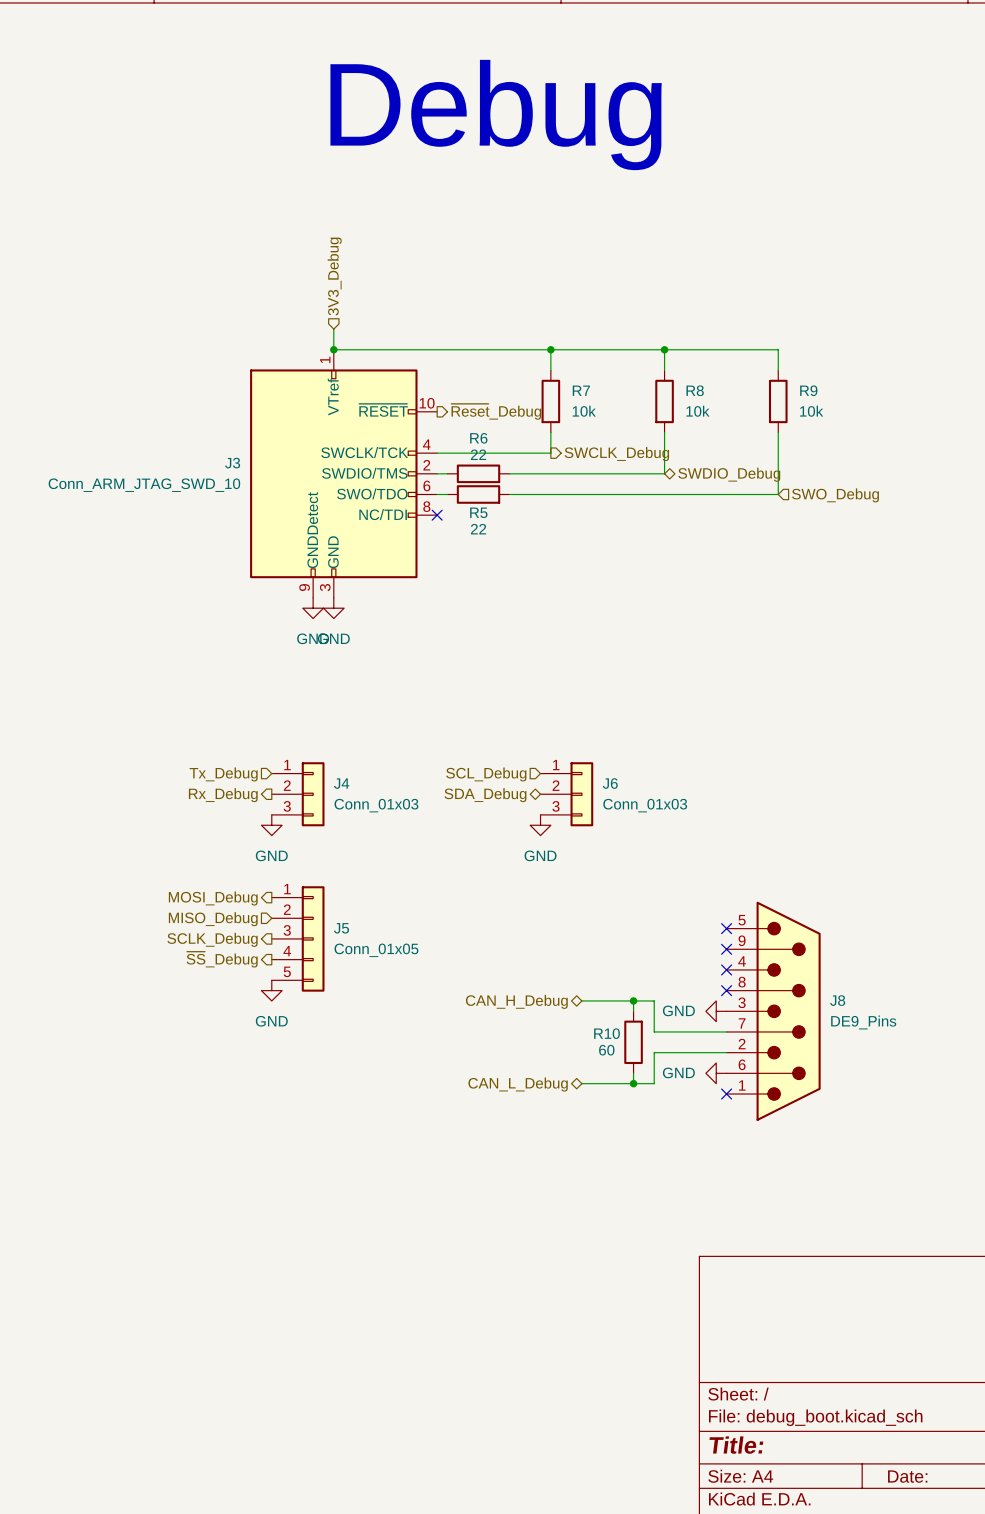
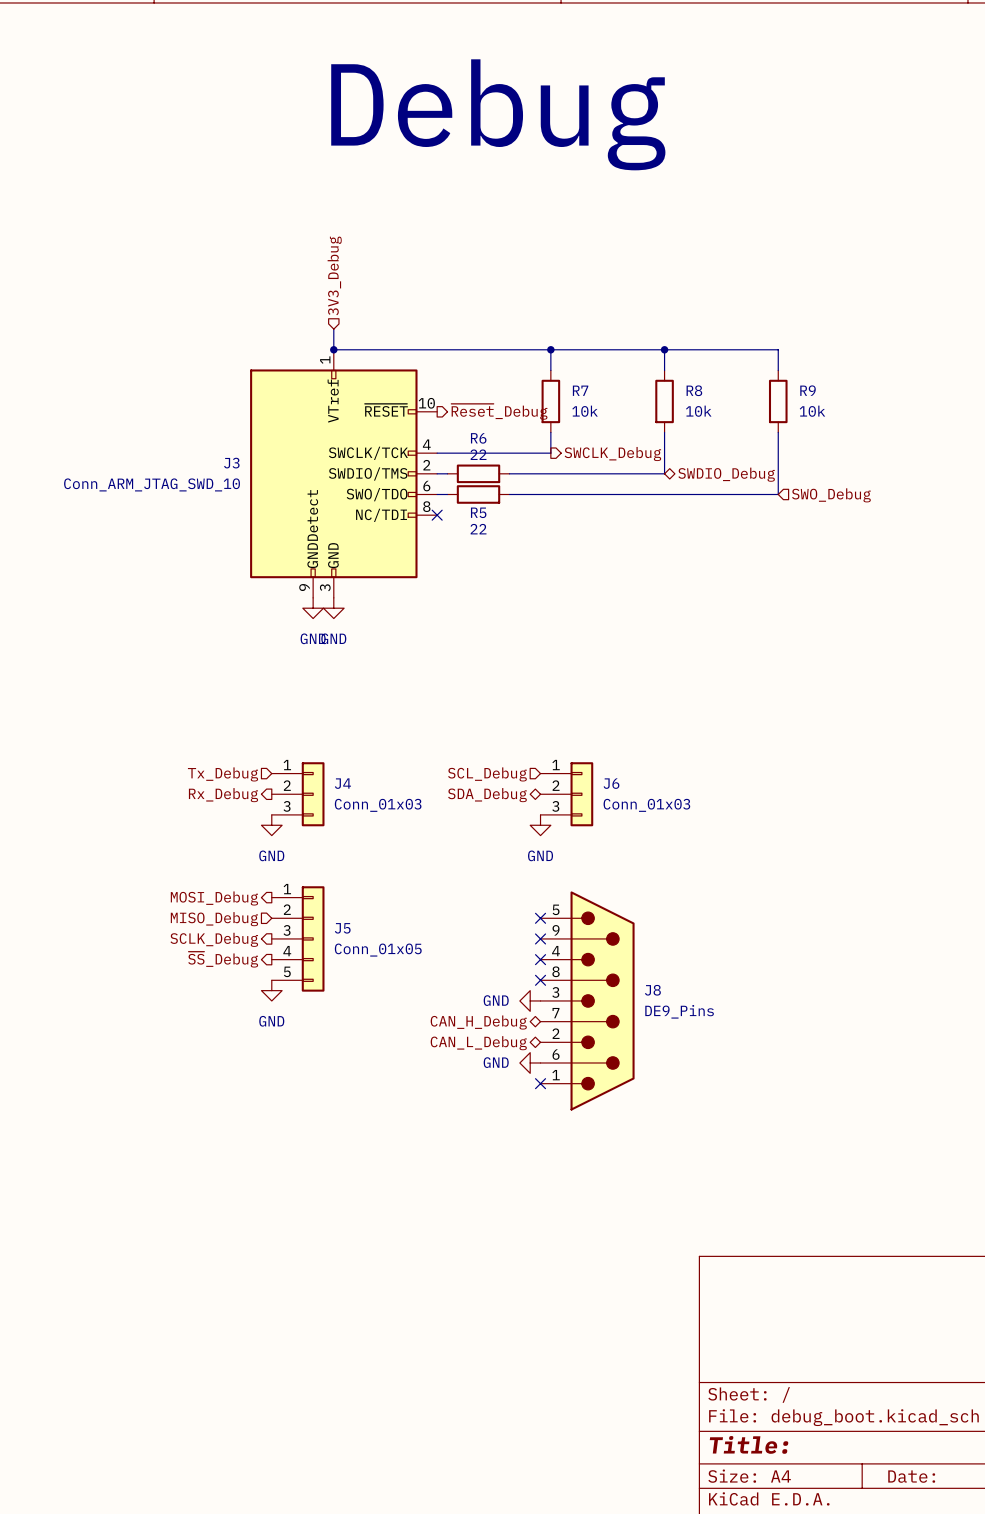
no-connect mark: none -> (540, 918)
no-connect mark: (726, 928) -> none
no-connect mark: none -> (540, 938)
no-connect mark: (726, 949) -> none
no-connect mark: none -> (540, 959)
no-connect mark: (726, 969) -> none
no-connect mark: none -> (540, 980)
no-connect mark: (726, 990) -> none
power symbol: none -> GND (530, 1000)
wire: (581, 1000) (654, 1000) (654, 1031) (726, 1031) -> none
junction: (633, 1000) -> none
hierarchical label position: CAN_H_Debug (516, 1001) -> CAN_H_Debug (478, 1022)
power symbol: GND (716, 1011) -> none
J8 position: (773, 1011) -> (587, 1000)
R10: 60 (633, 1042) -> none
wire: (726, 1052) (654, 1052) (654, 1083) (581, 1083) -> none
power symbol: none -> GND (530, 1062)
power symbol: GND (716, 1073) -> none
no-connect mark: none -> (540, 1083)
junction: (633, 1083) -> none
hierarchical label position: CAN_L_Debug (518, 1084) -> CAN_L_Debug (478, 1043)
no-connect mark: (726, 1094) -> none

